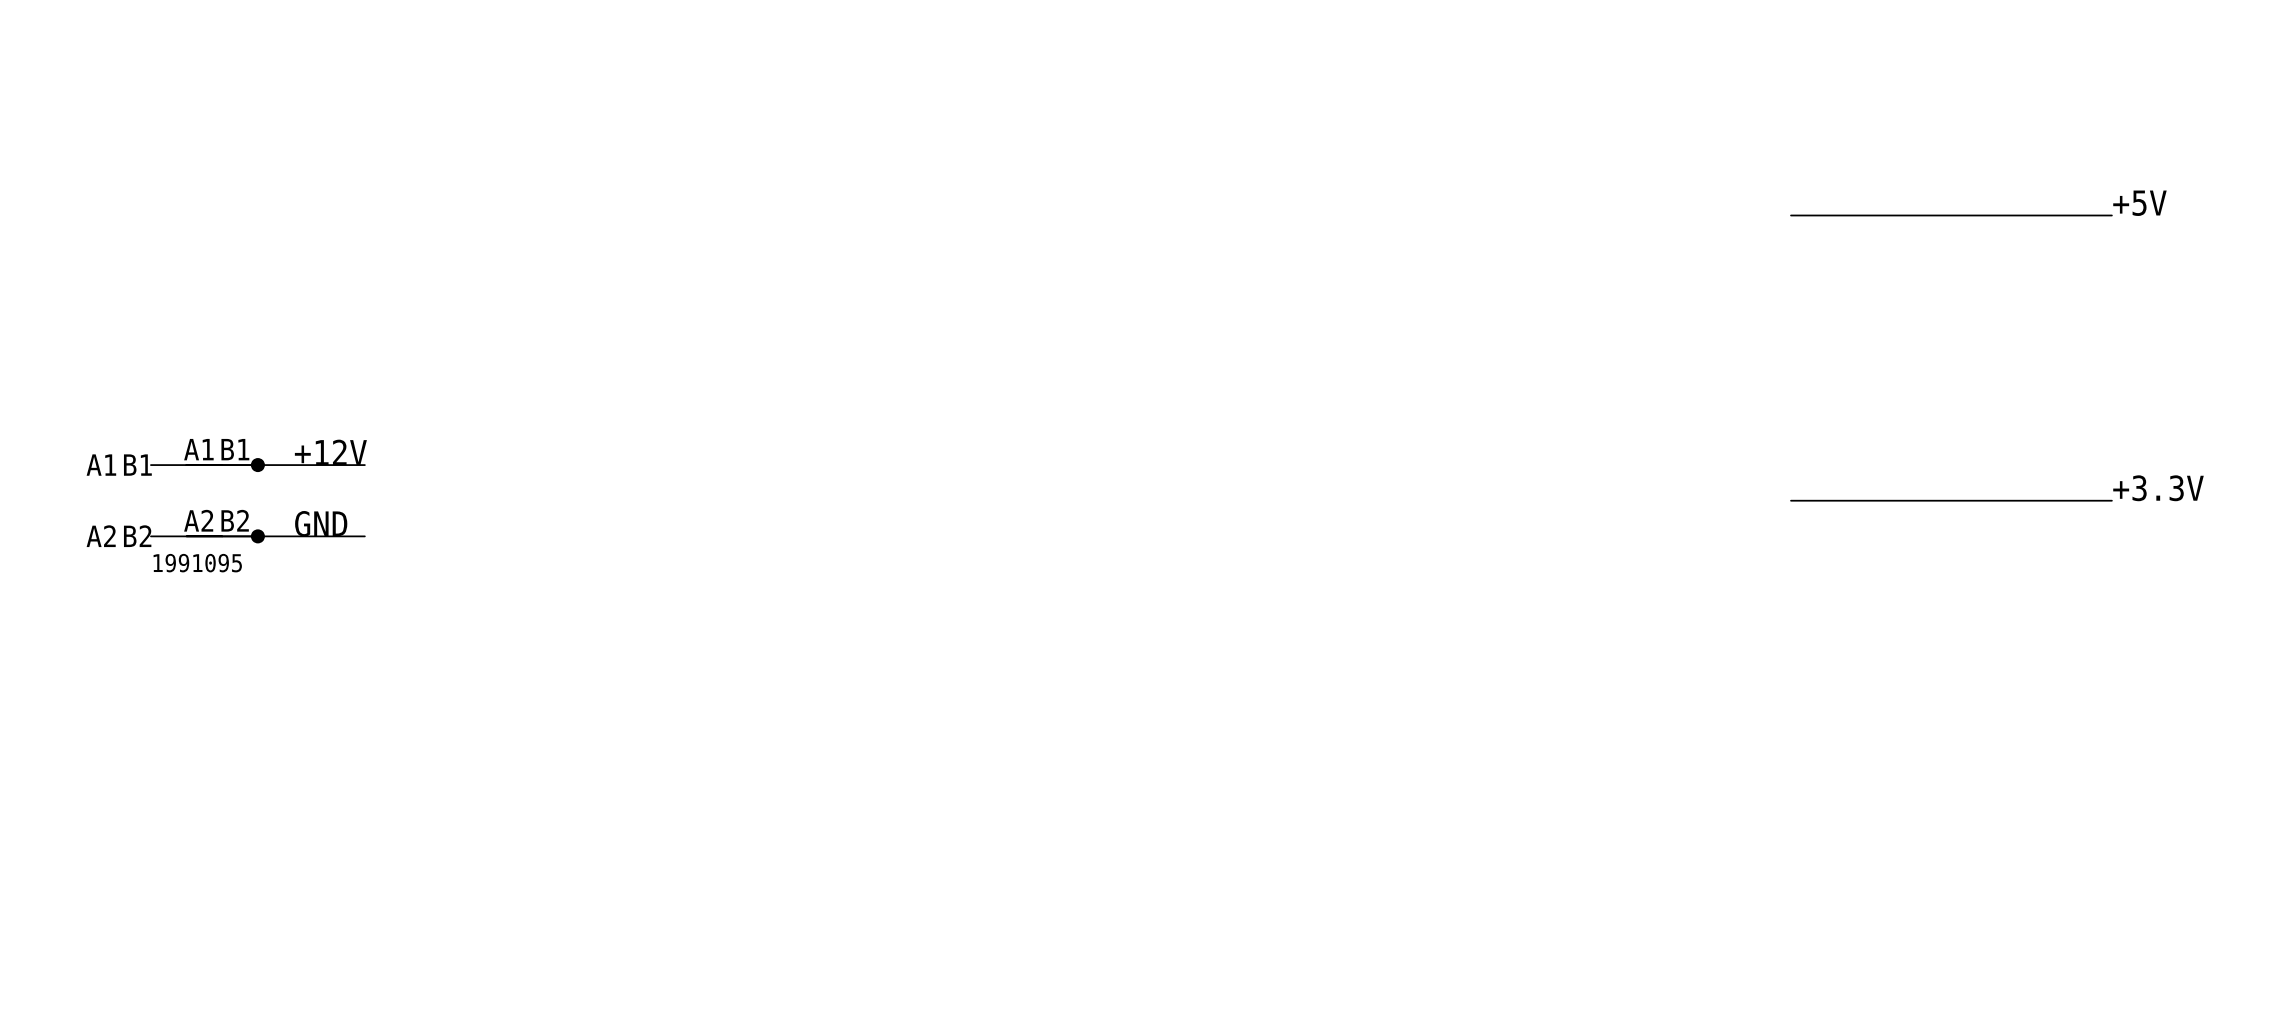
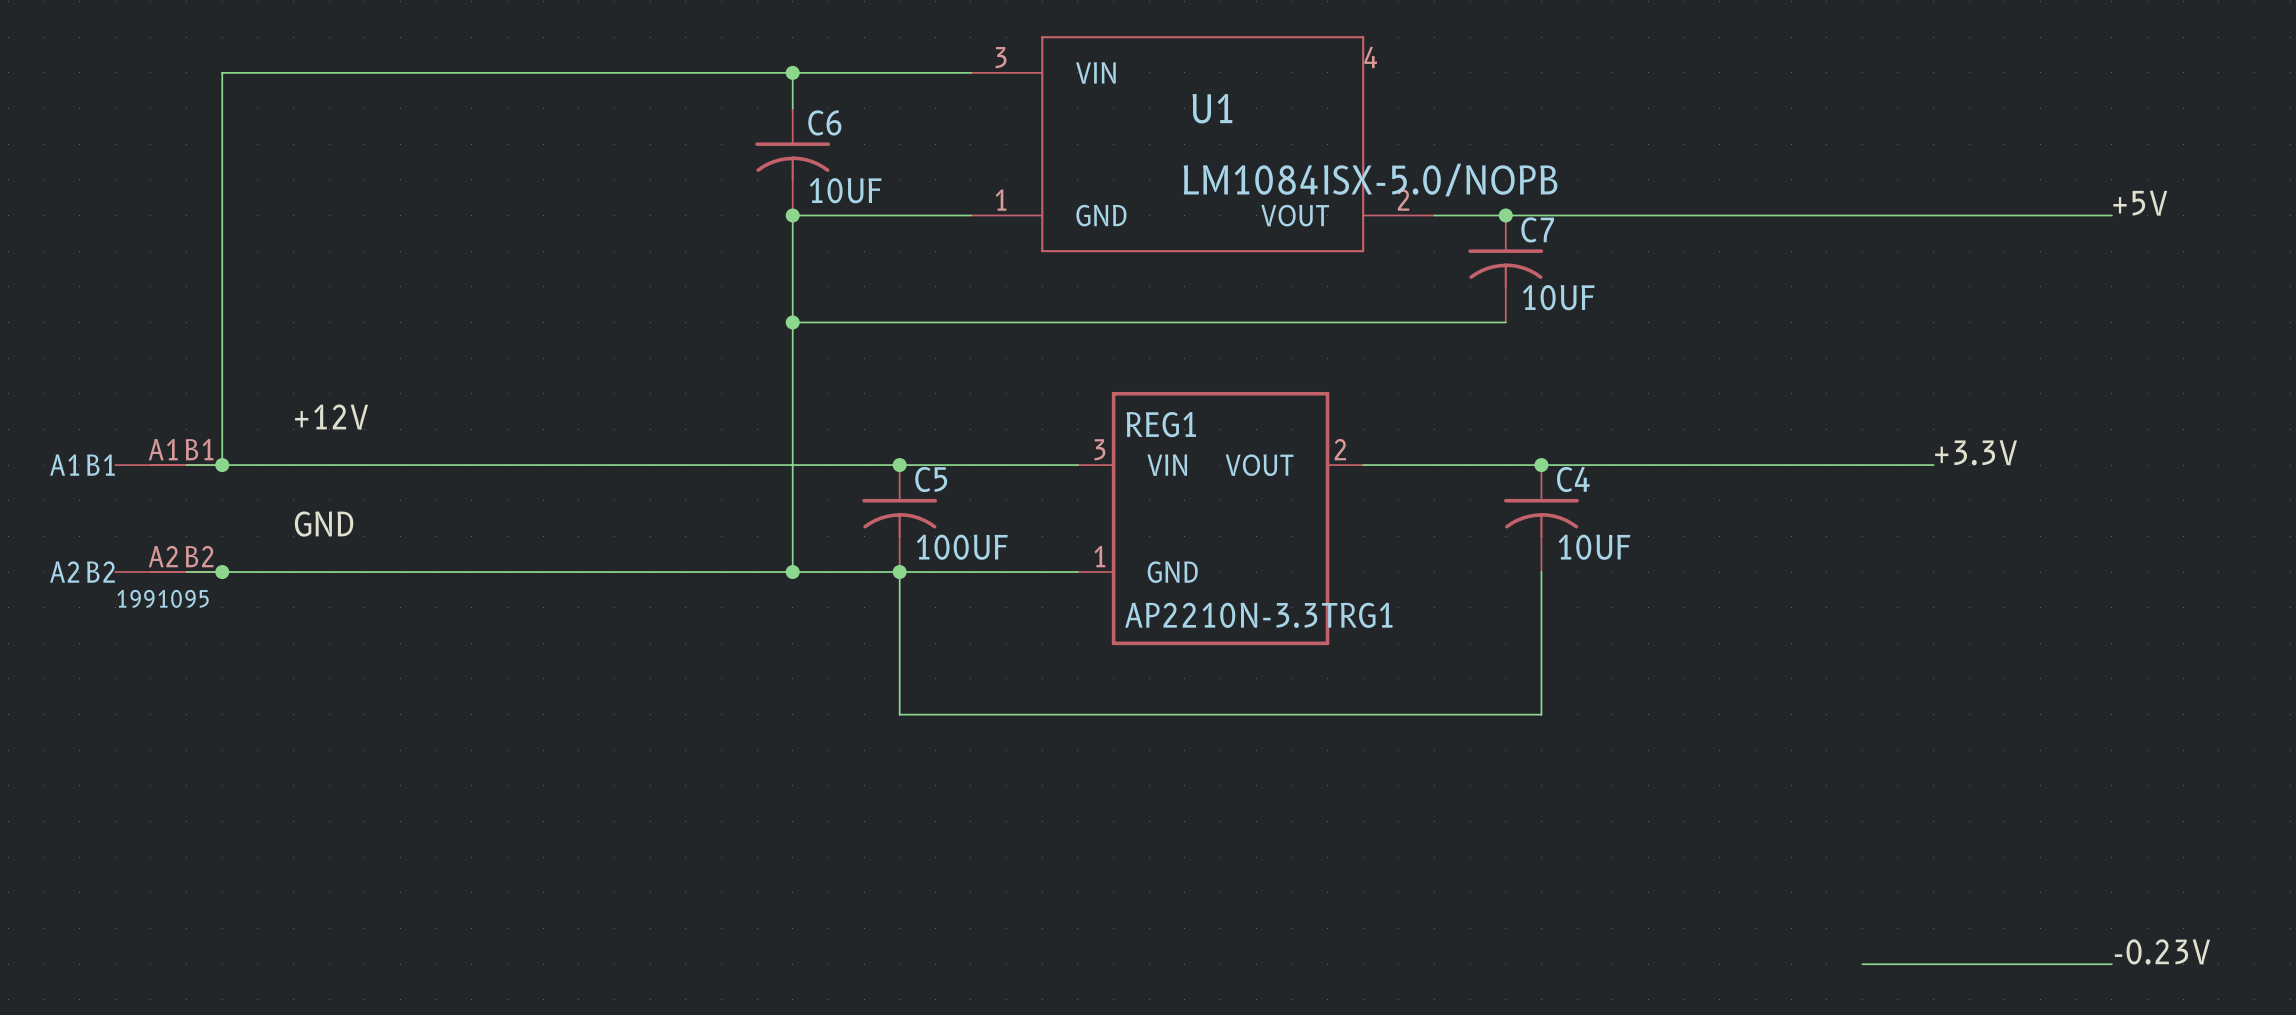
wire: none -> (792, 72) (792, 108)
junction: none -> (792, 72)
wire: none -> (970, 72) (222, 72) (222, 465) (186, 465)
U1: none -> LM1084ISX-5.0/NOPB (1202, 144)
C6: none -> 10UF (792, 162)
junction: none -> (792, 215)
wire: none -> (970, 215) (792, 215) (792, 572)
wire: none -> (1434, 215) (1791, 215)
junction: none -> (1505, 215)
C7: none -> 10UF (1505, 268)
wire: none -> (792, 322) (1505, 322)
junction: none -> (792, 322)
label position: +12V (330, 452) -> +12V (331, 417)
part position: (204, 465) -> (168, 465)
junction position: (257, 465) -> (222, 465)
wire: none -> (364, 465) (1077, 465)
junction: none -> (899, 465)
wire: none -> (1363, 465) (1933, 465)
junction: none -> (1541, 465)
label position: +3.3V (2158, 488) -> +3.3V (1976, 452)
wire: (1791, 500) (2111, 500) -> none
C5: none -> 100UF (899, 518)
REG1: none -> AP2210N-3.3TRG1 (1220, 518)
C4: none -> 10UF (1541, 518)
part position: (204, 536) -> (168, 572)
wire: (222, 536) (364, 536) -> none
junction: (257, 536) -> none
wire: none -> (186, 572) (1077, 572)
junction: none -> (222, 572)
junction: none -> (792, 572)
wire: none -> (899, 572) (899, 714) (1541, 714) (1541, 572)
junction: none -> (899, 572)
label: none -> -0.23V (2162, 951)
wire: none -> (1862, 964) (2111, 964)

